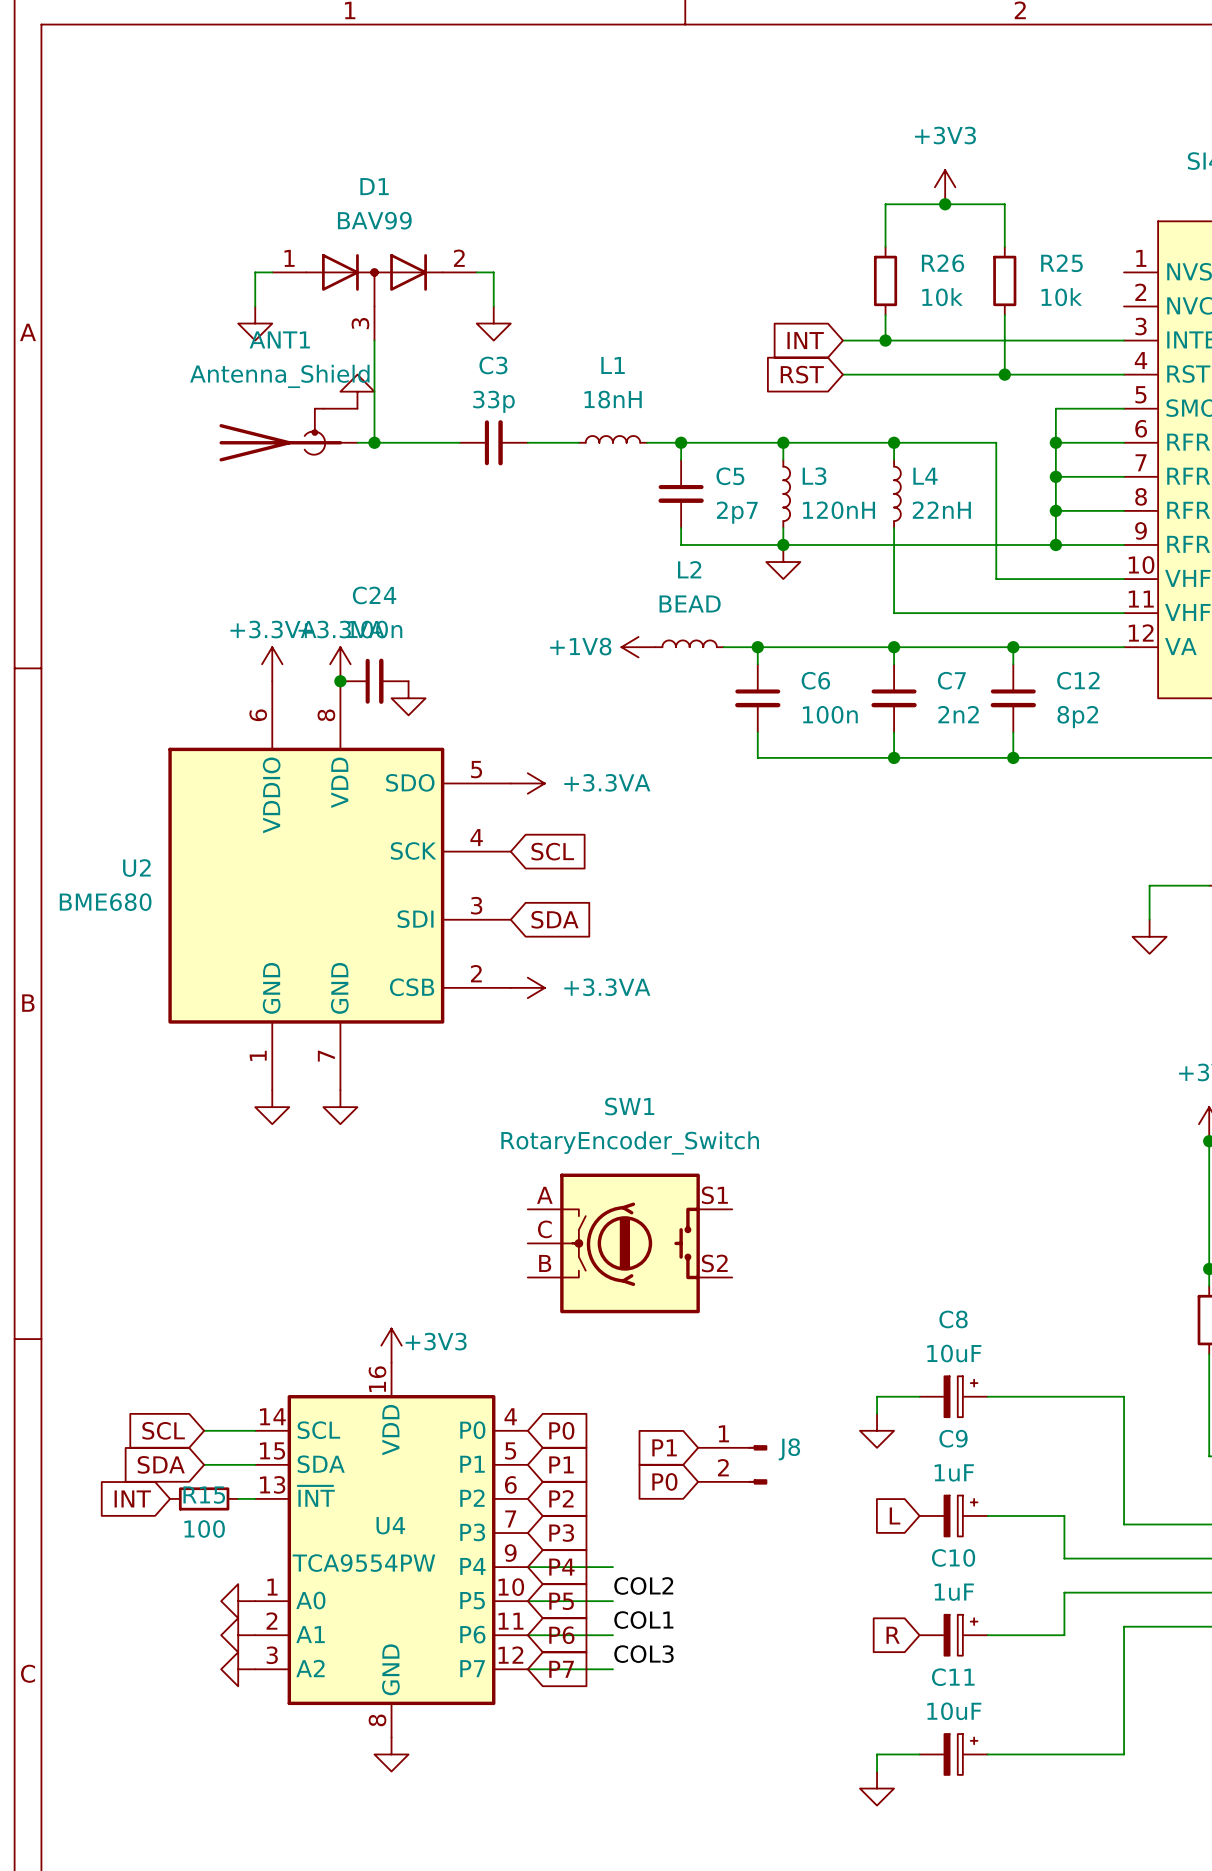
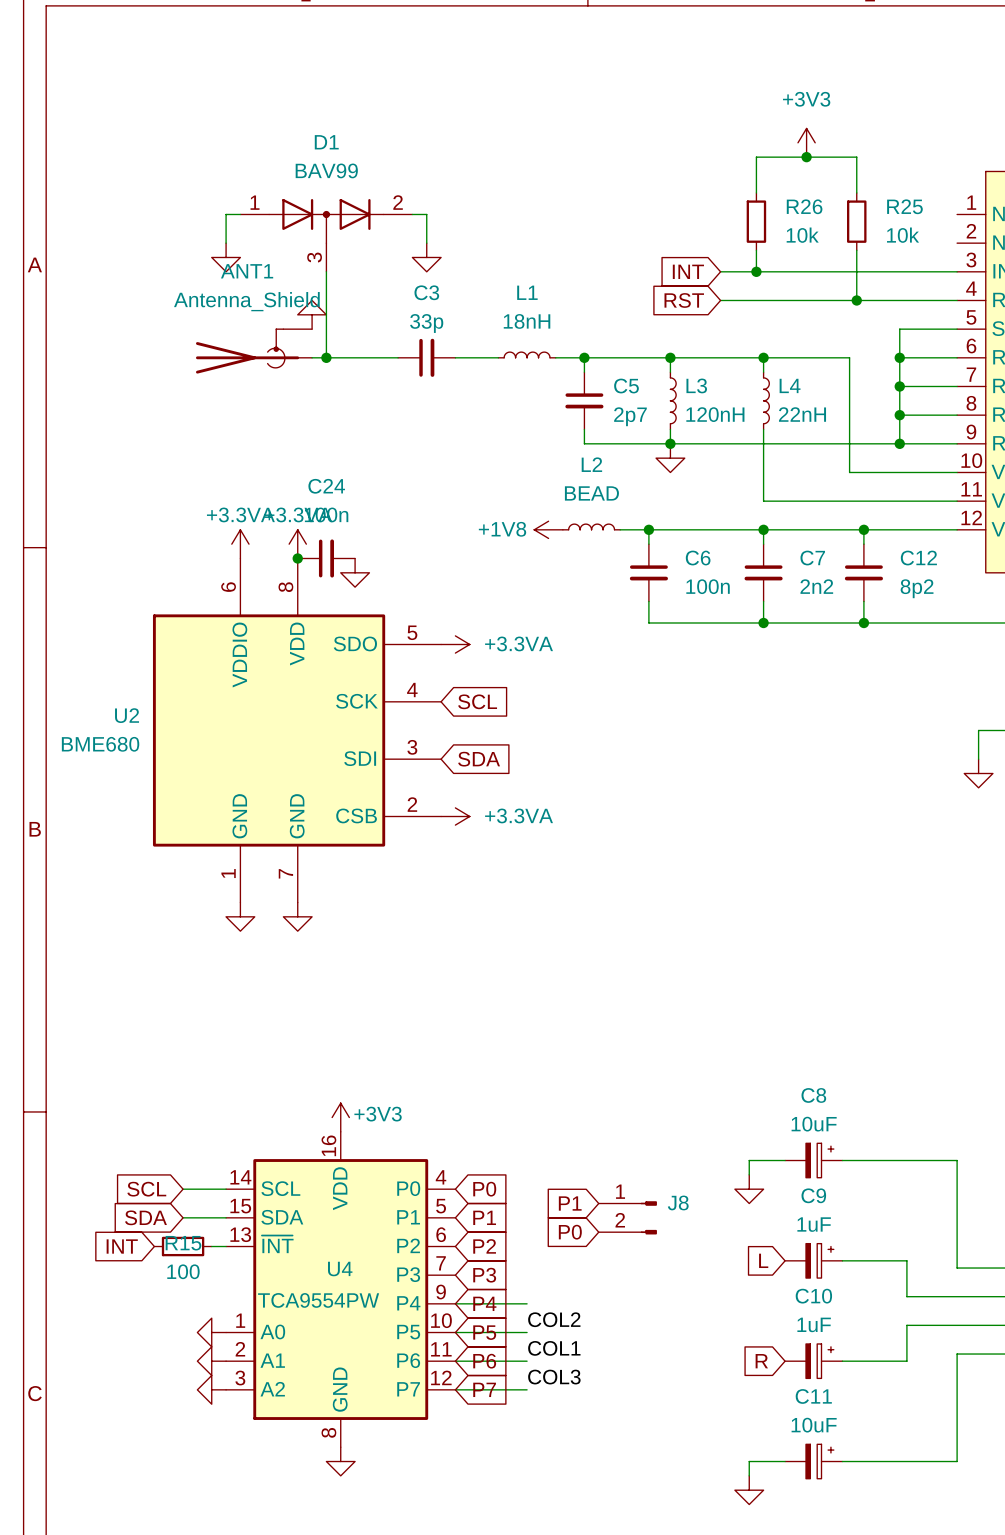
SW1: RotaryEncoder_Switch (630, 1243) -> none

